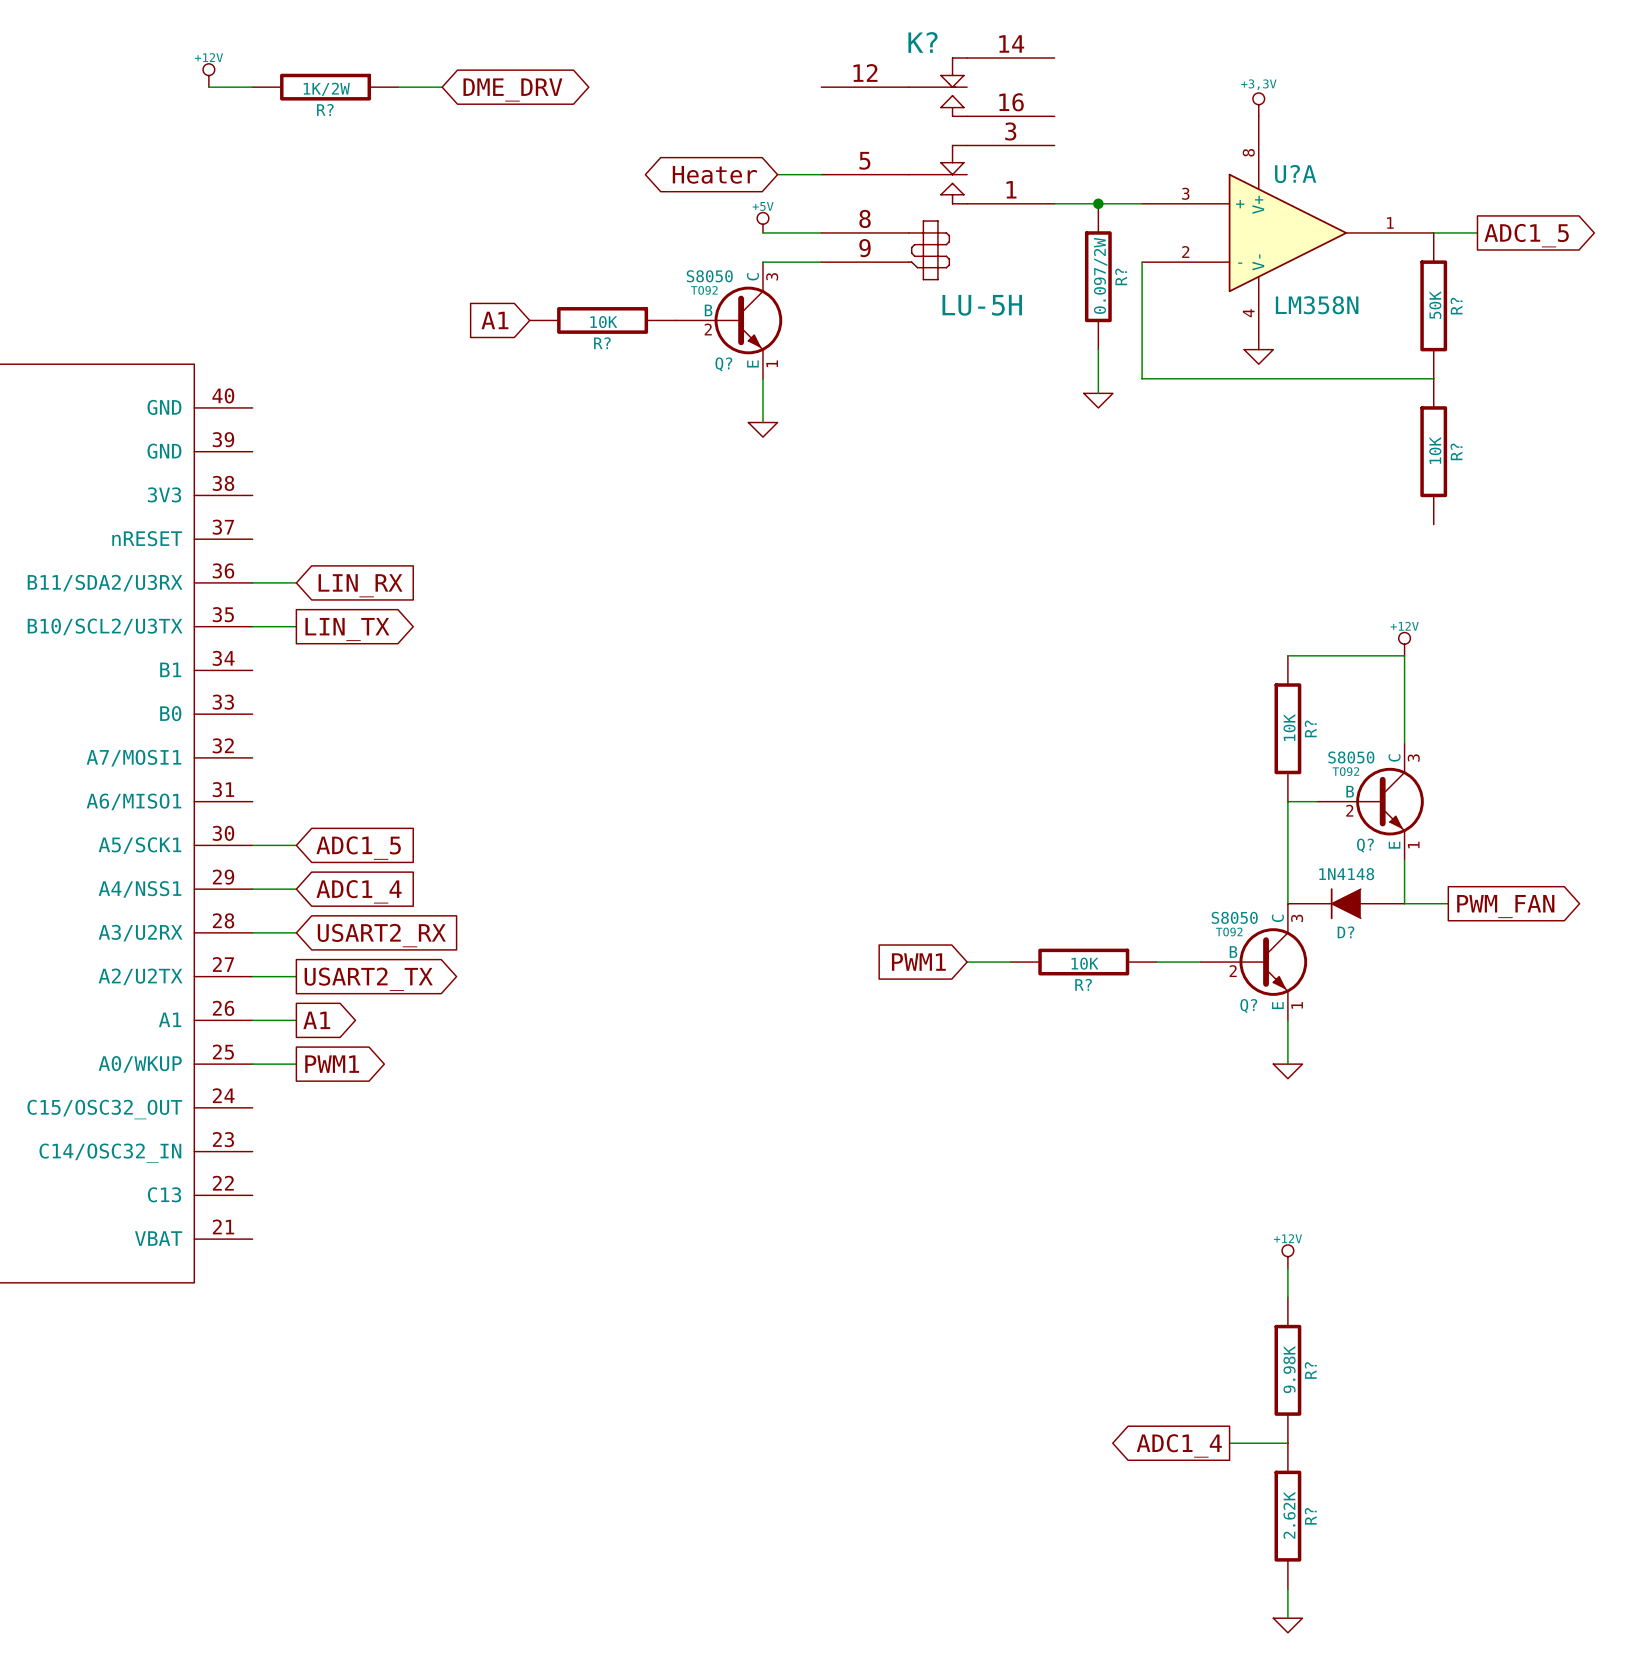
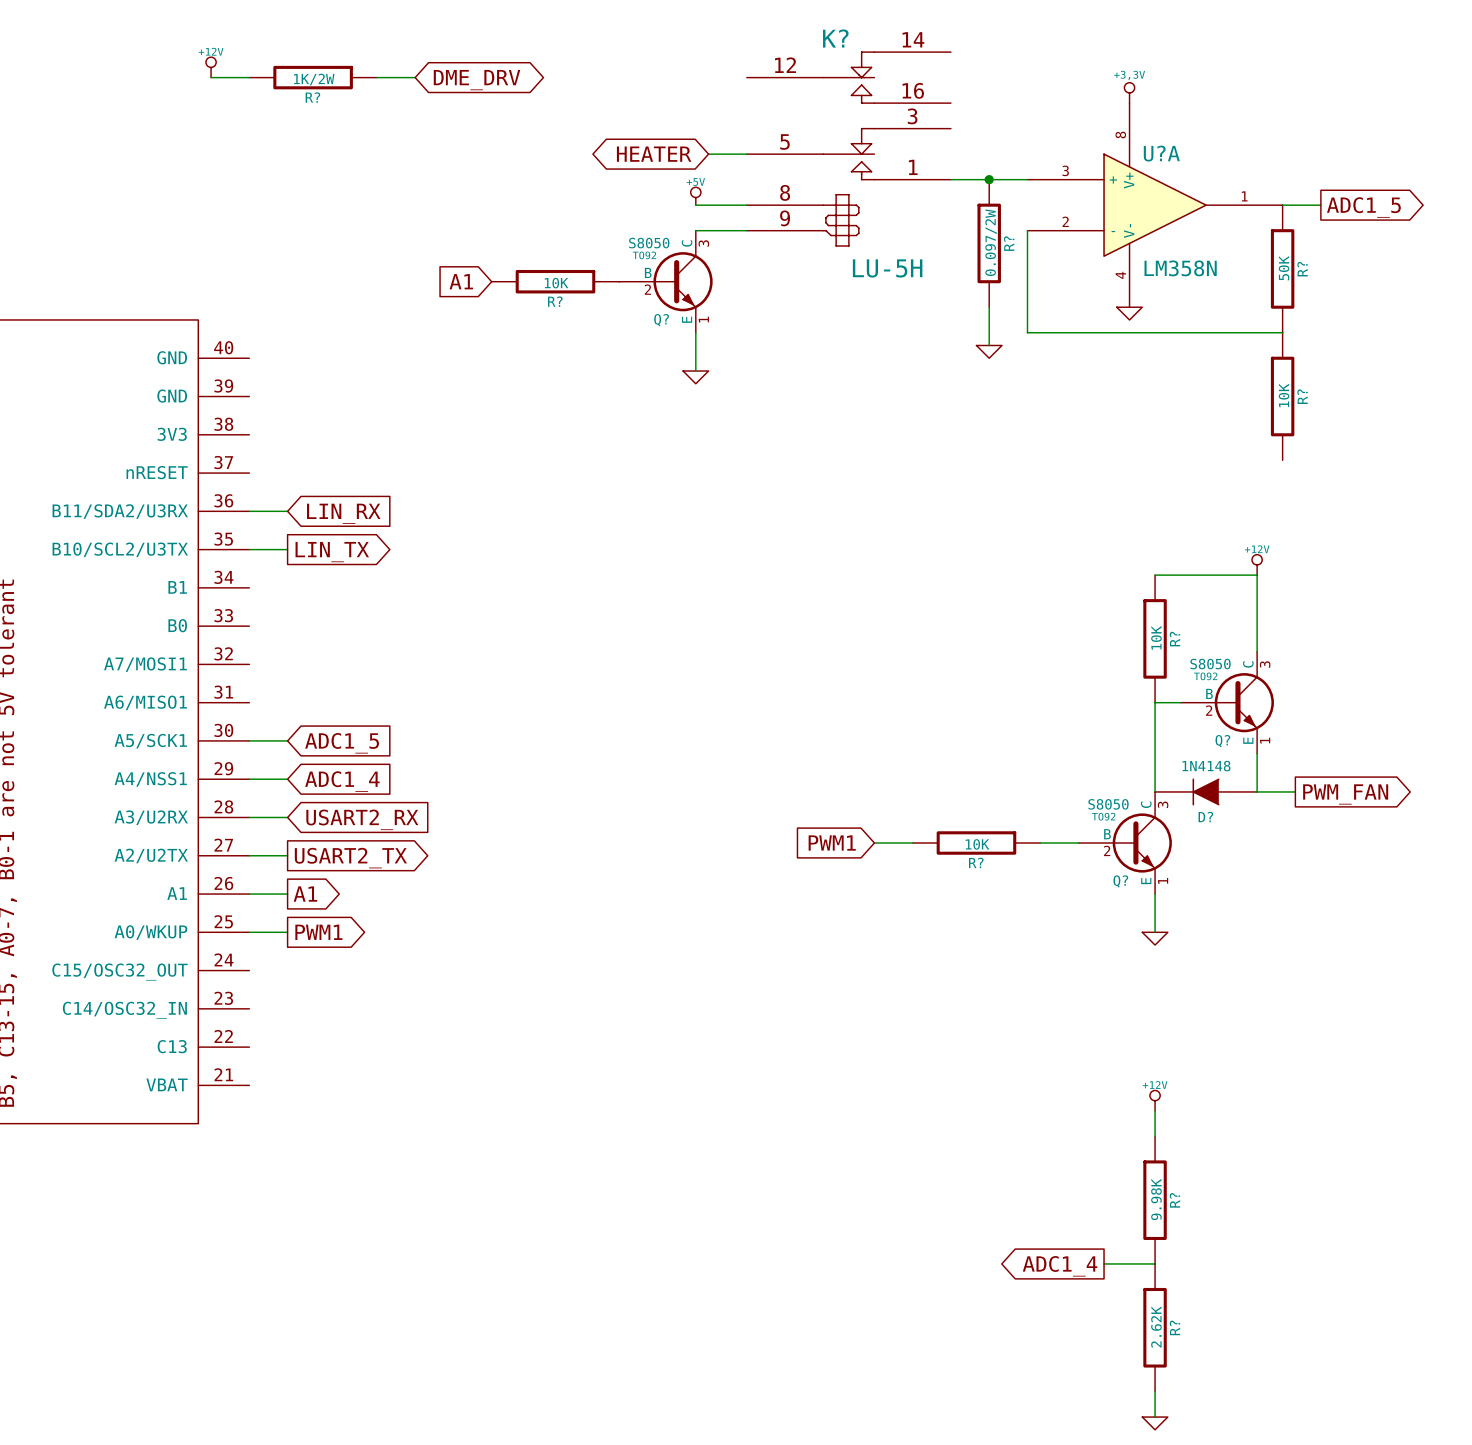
global label: Heater (714, 174) -> HEATER (654, 154)

